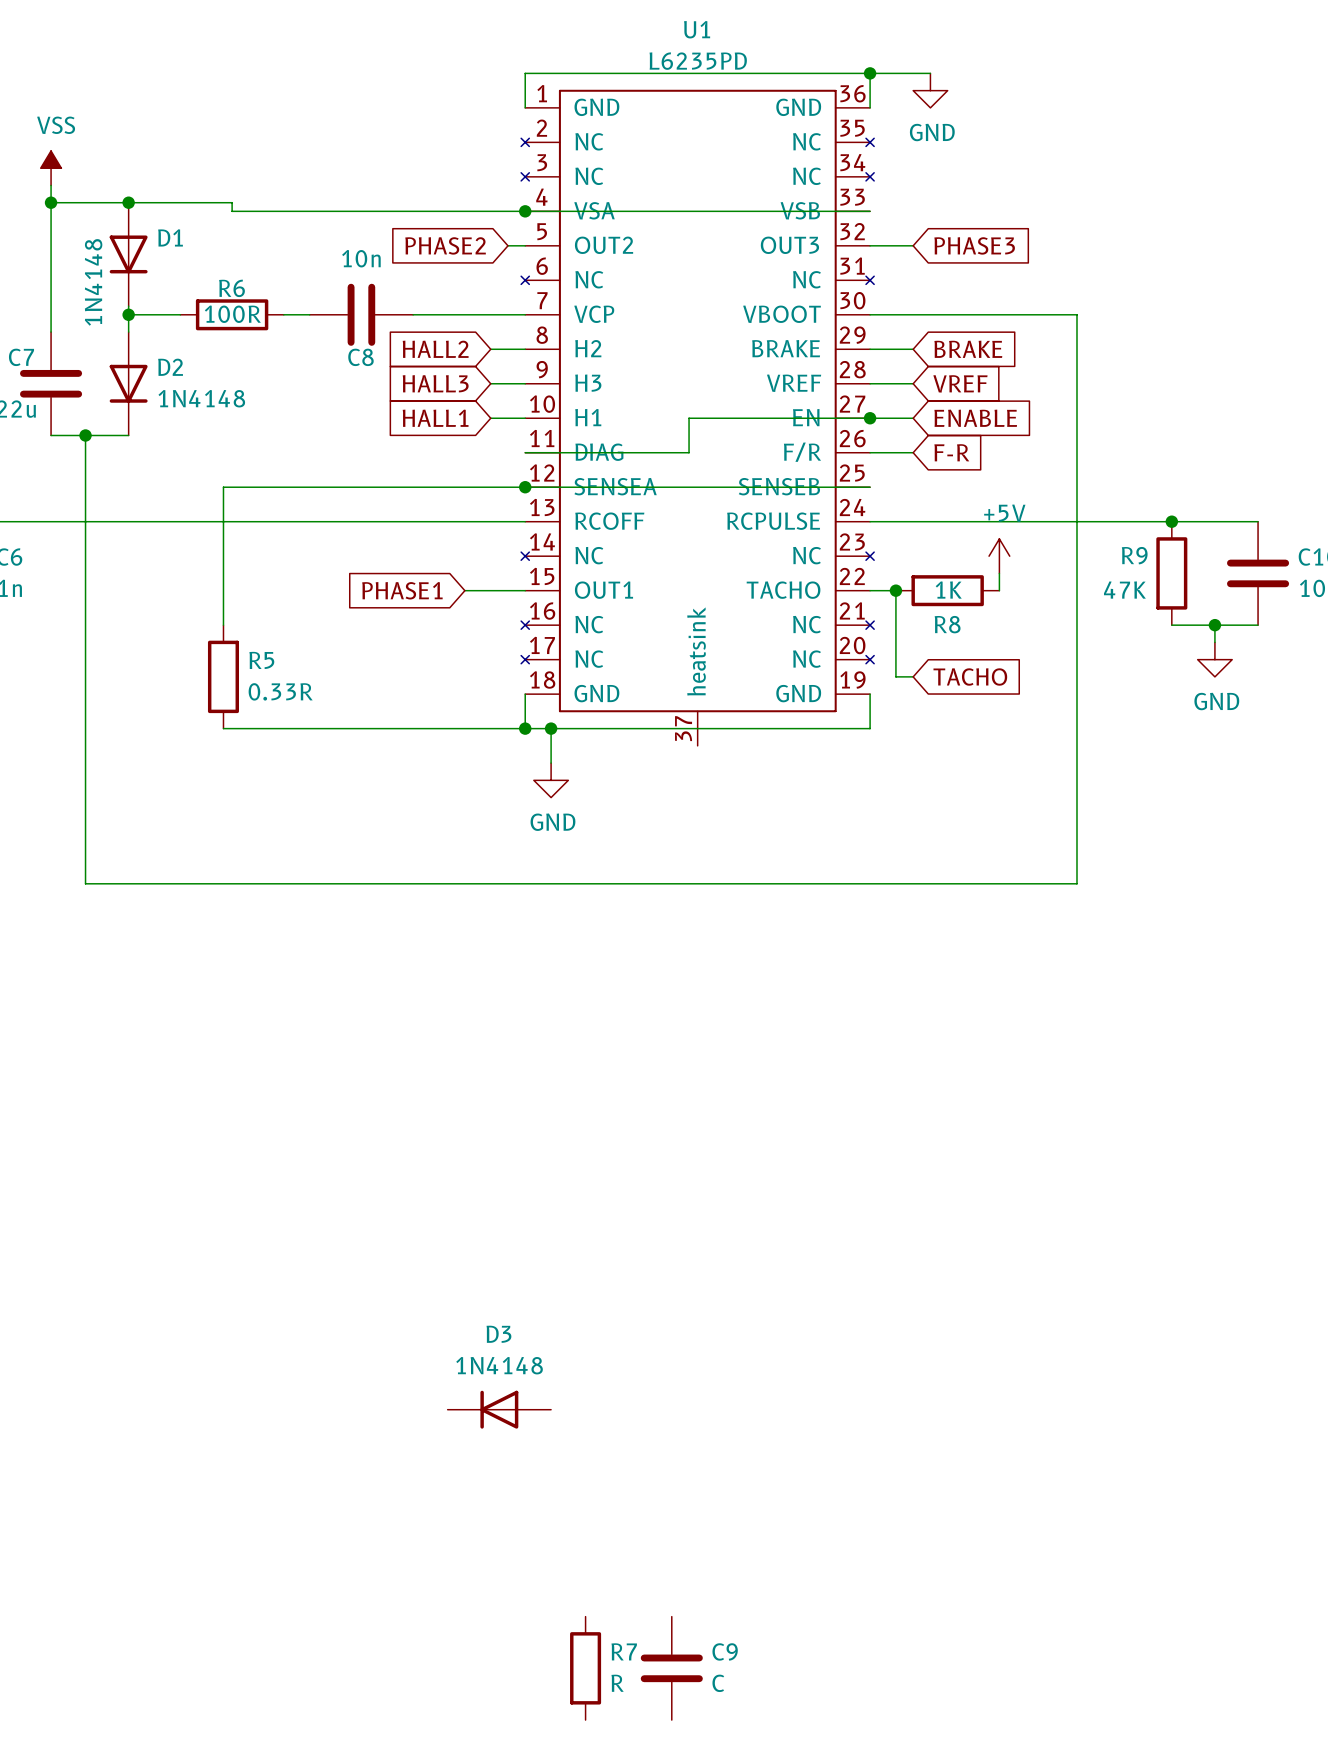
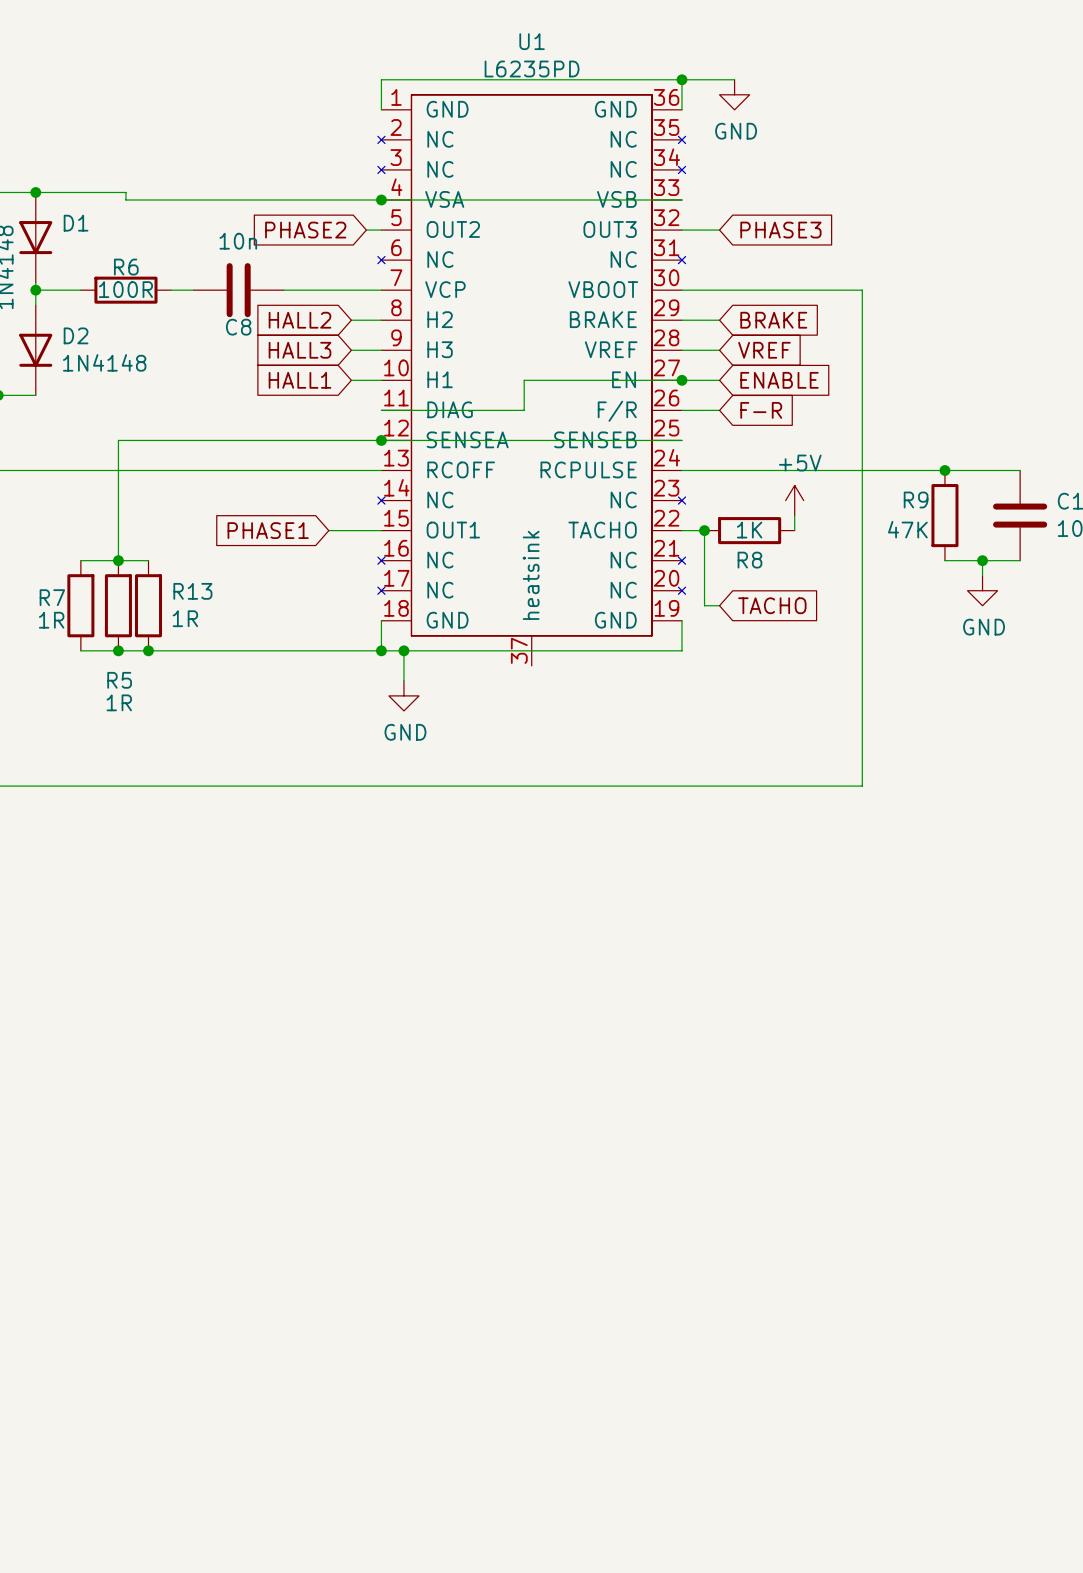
wire: none -> (80, 560) (148, 560)
junction: none -> (118, 560)
R5 name position: R5 (261, 660) -> R5 (119, 680)
R13: none -> 1R (148, 605)
R5 value: 0.33R (280, 691) -> 1R (119, 702)
wire: none -> (80, 650) (118, 650)
junction: none -> (118, 650)
junction: none -> (148, 650)
D3: 1N4148 (499, 1409) -> none
R7 name position: R7 (624, 1651) -> R7 (52, 597)
R7 position: (585, 1668) -> (80, 605)
C9: C (671, 1668) -> none
R7 value: R (617, 1683) -> 1R (51, 620)

